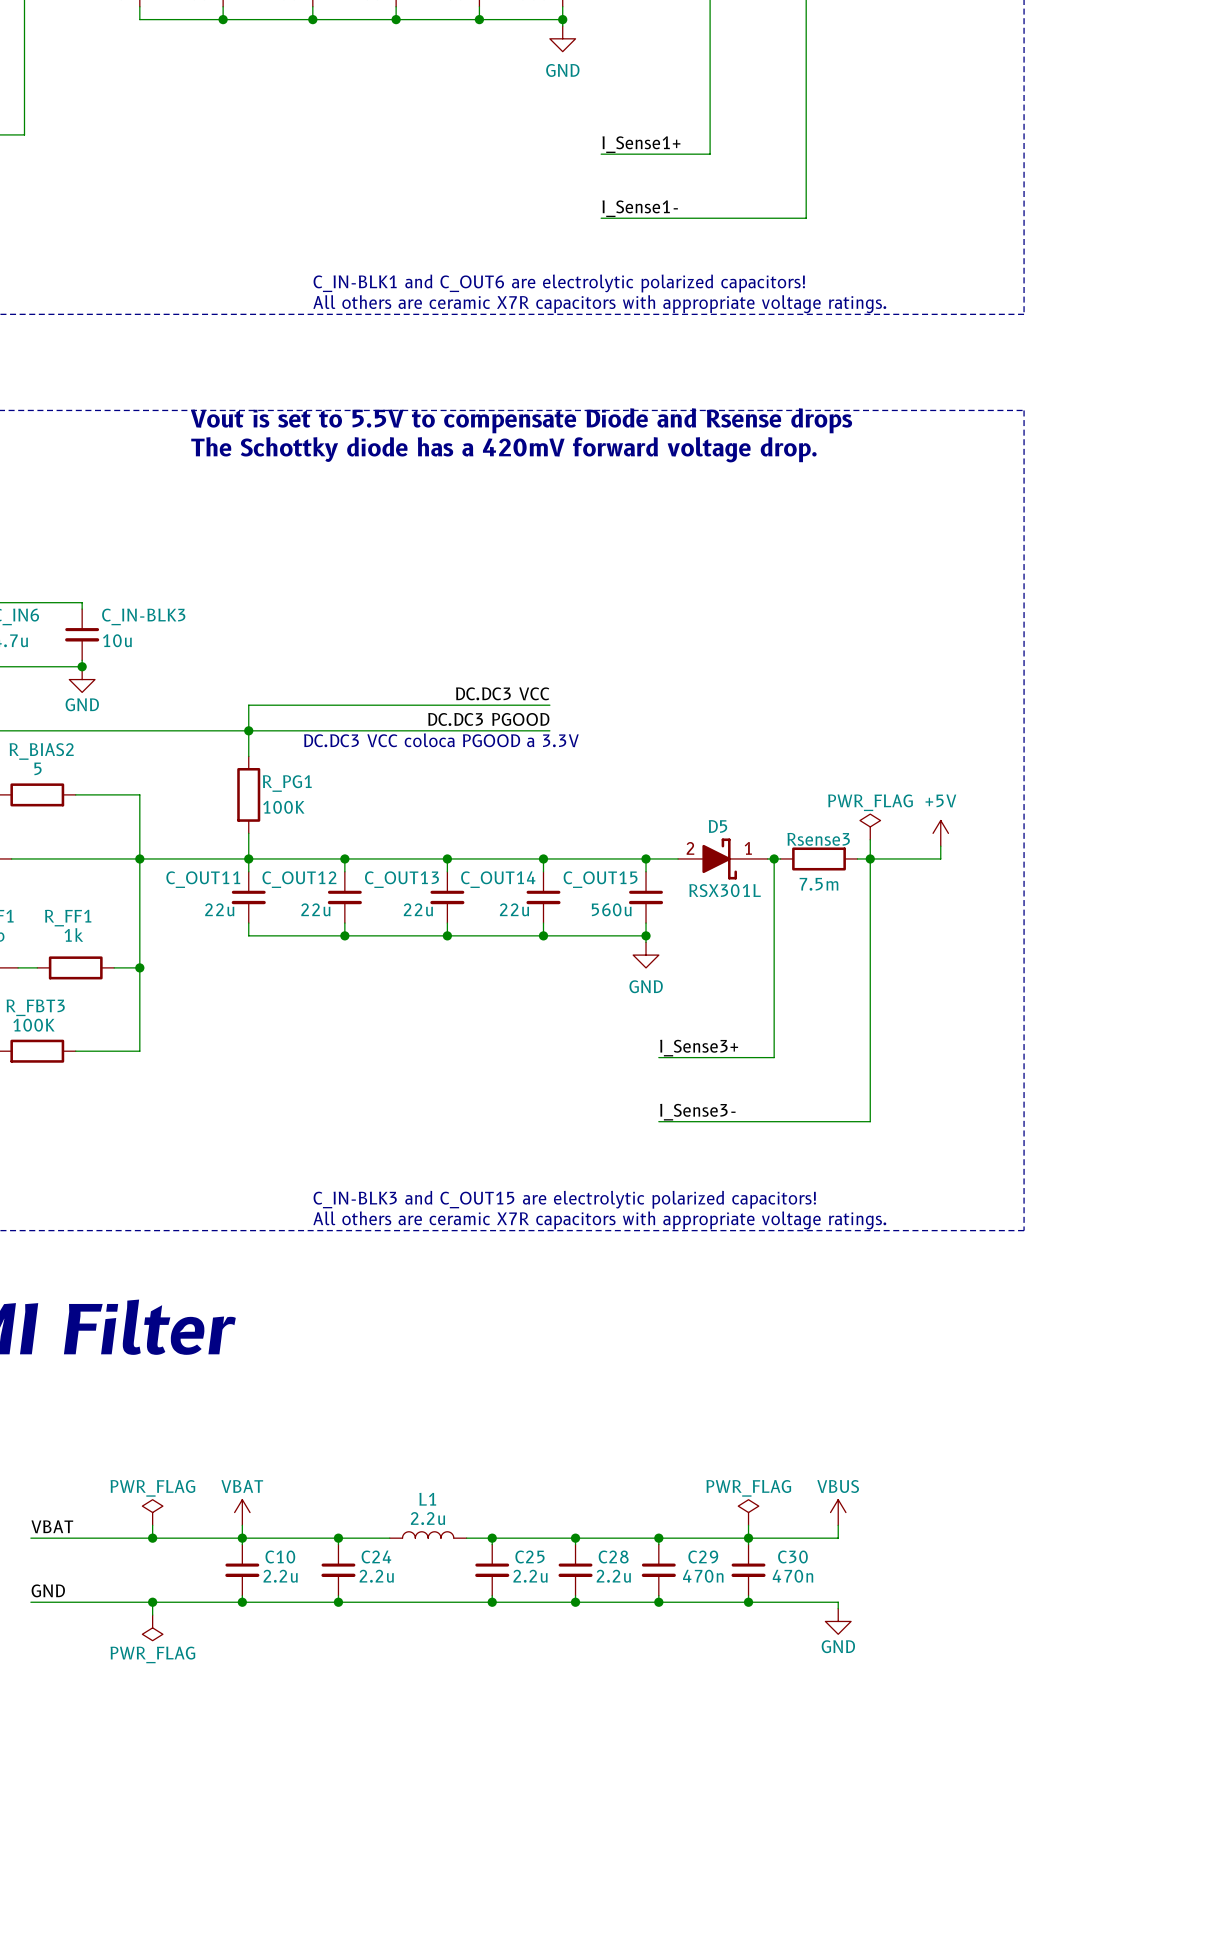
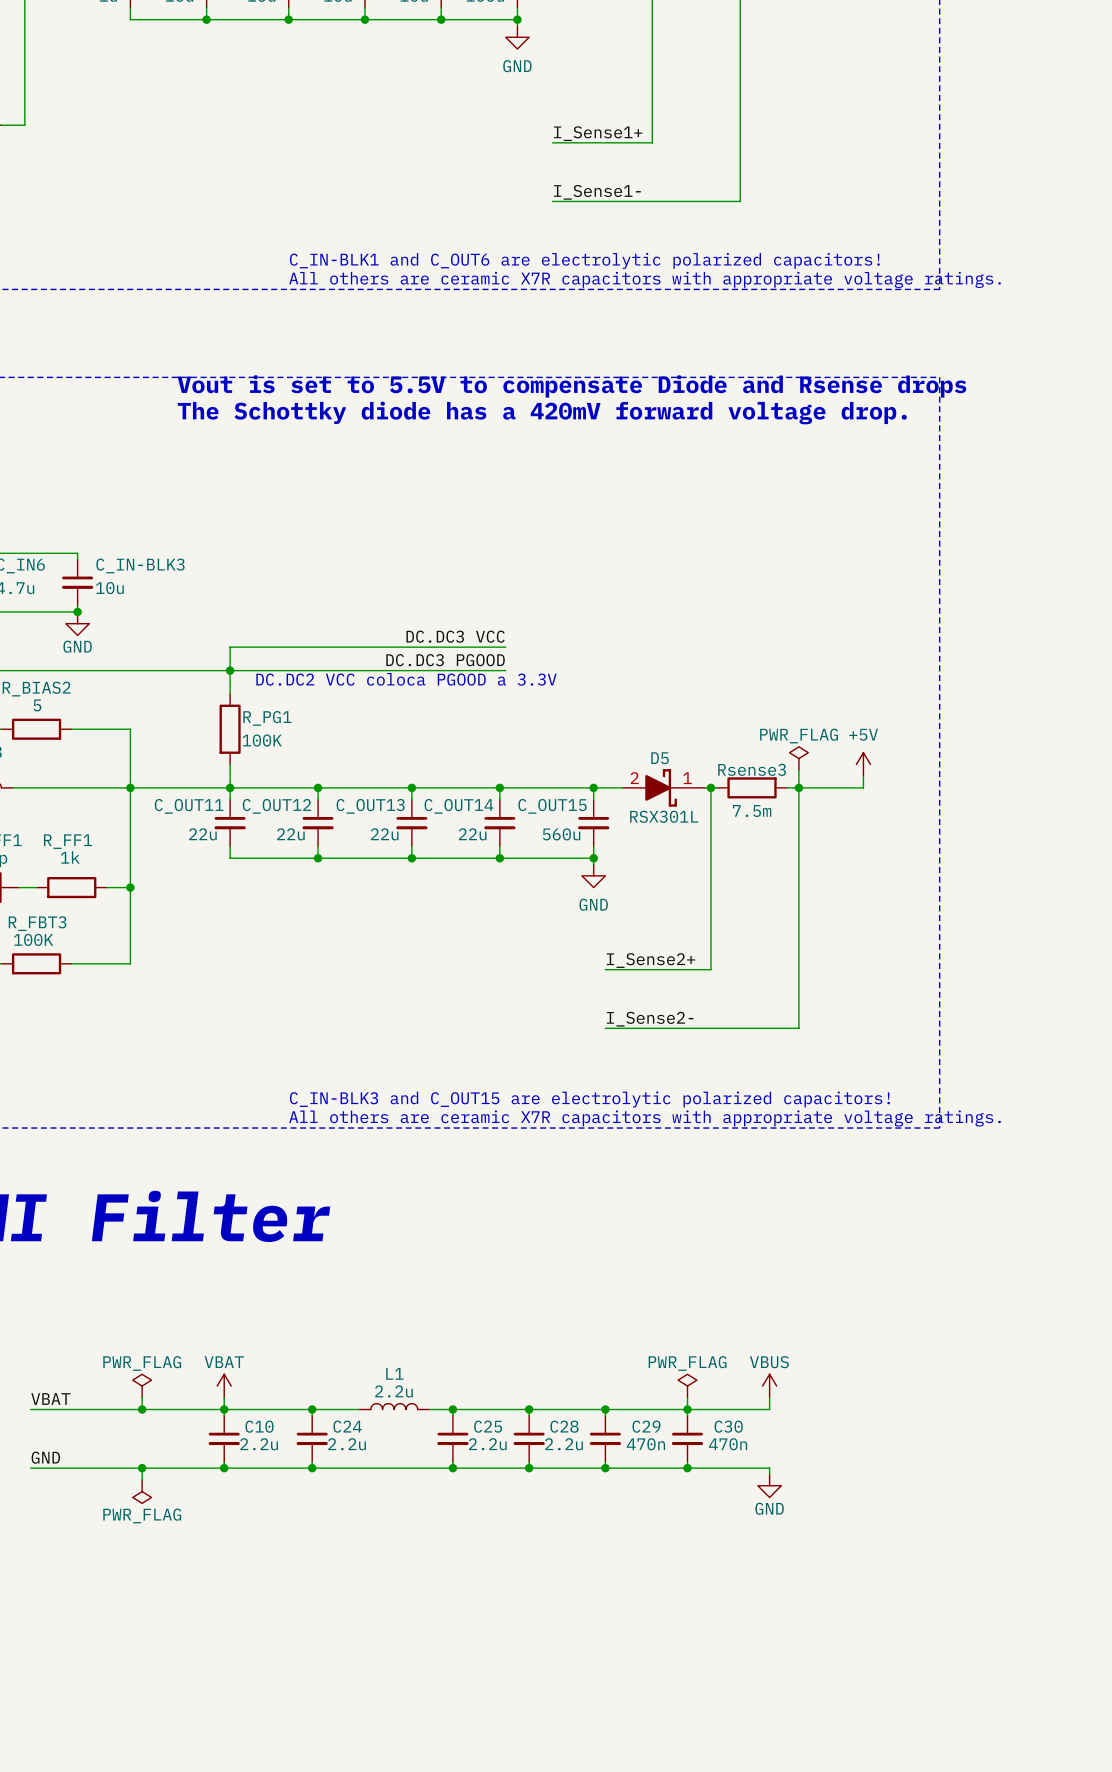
text: DC.DC3 VCC coloca PGOOD a 3.3V (441, 740) -> DC.DC2 VCC coloca PGOOD a 3.3V (406, 679)
label: I_Sense3+ (699, 1048) -> I_Sense2+ (650, 960)
label: I_Sense3- (697, 1112) -> I_Sense2- (650, 1019)

